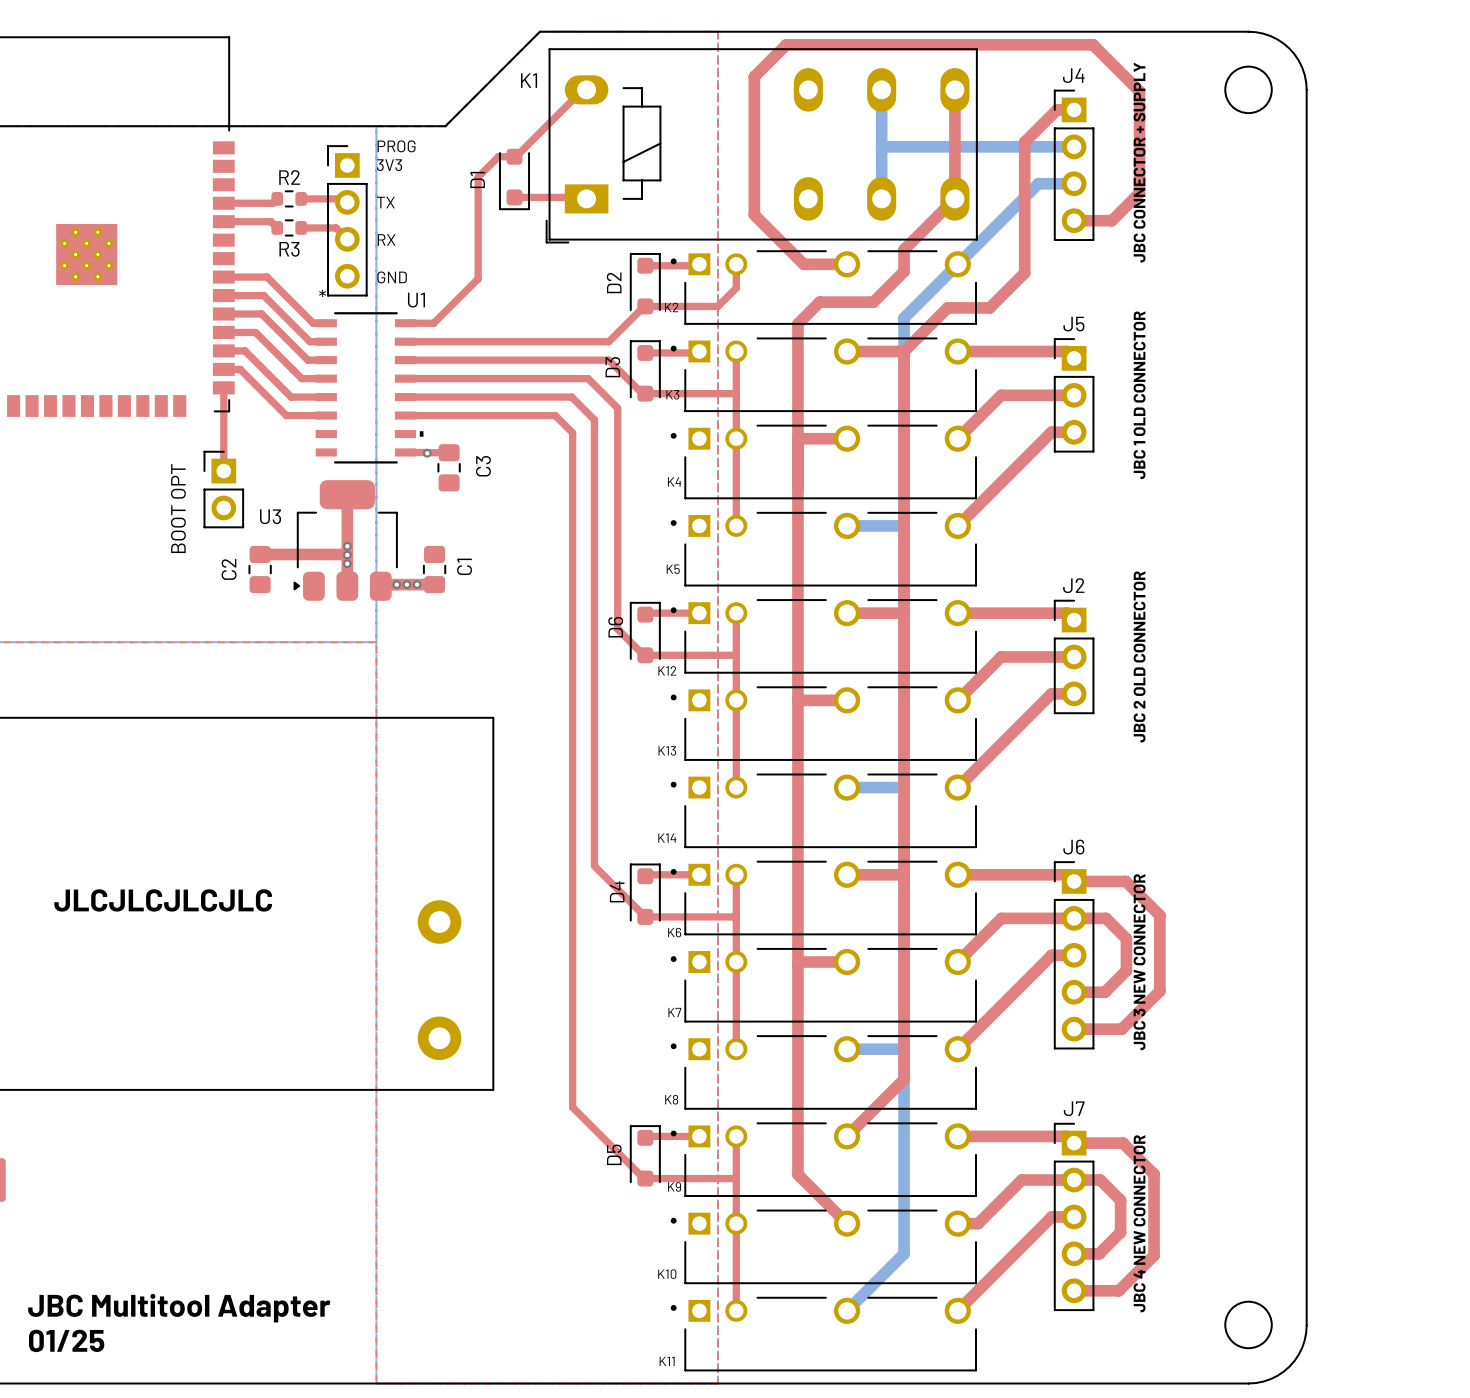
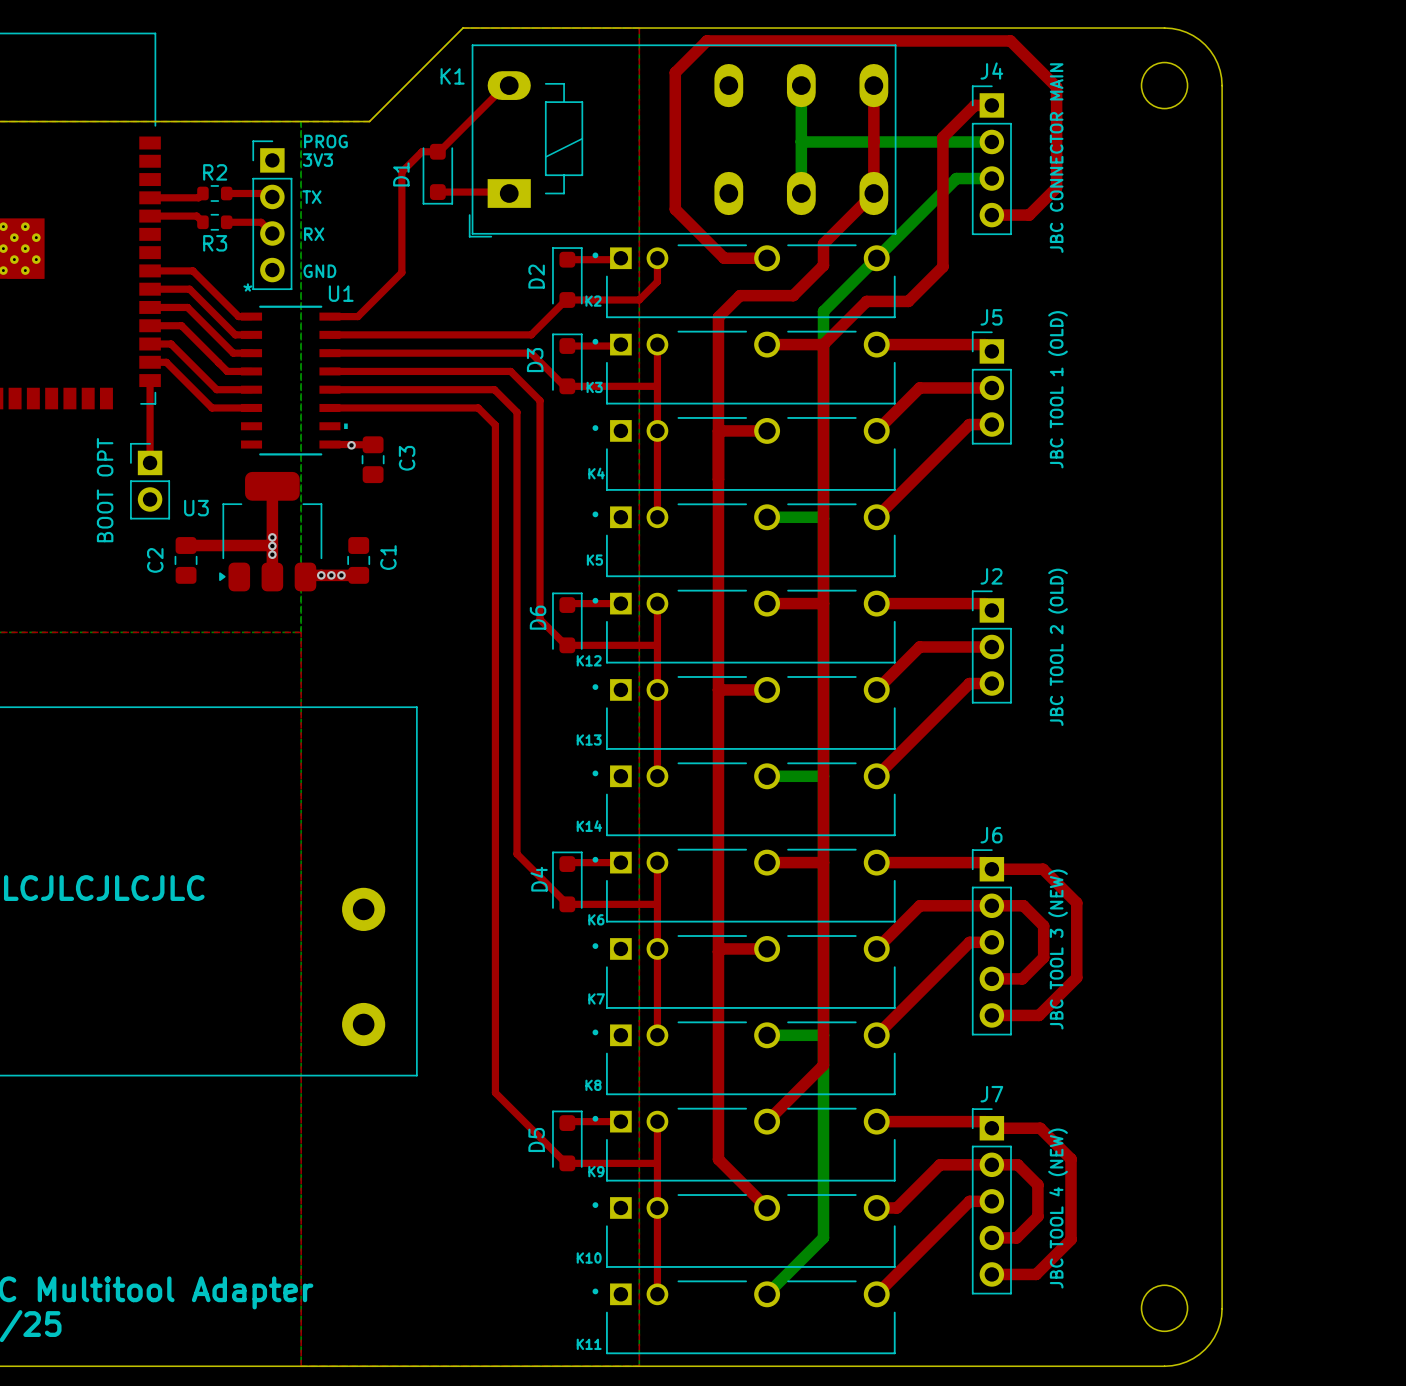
text: JBC CONNECTOR + SUPPLY (1139, 162) -> JBC CONNECTOR MAIN (1056, 158)
text: JBC 1 OLD CONNECTOR (1139, 395) -> JBC TOOL 1 (OLD) (1058, 389)
text: JBC 2 OLD CONNECTOR (1139, 656) -> JBC TOOL 2 (OLD) (1058, 647)
text: JBC 3 NEW CONNECTOR (1139, 962) -> JBC TOOL 3 (NEW) (1058, 949)
text: JBC 4 NEW CONNECTOR (1139, 1223) -> JBC TOOL 4 (NEW) (1058, 1208)

